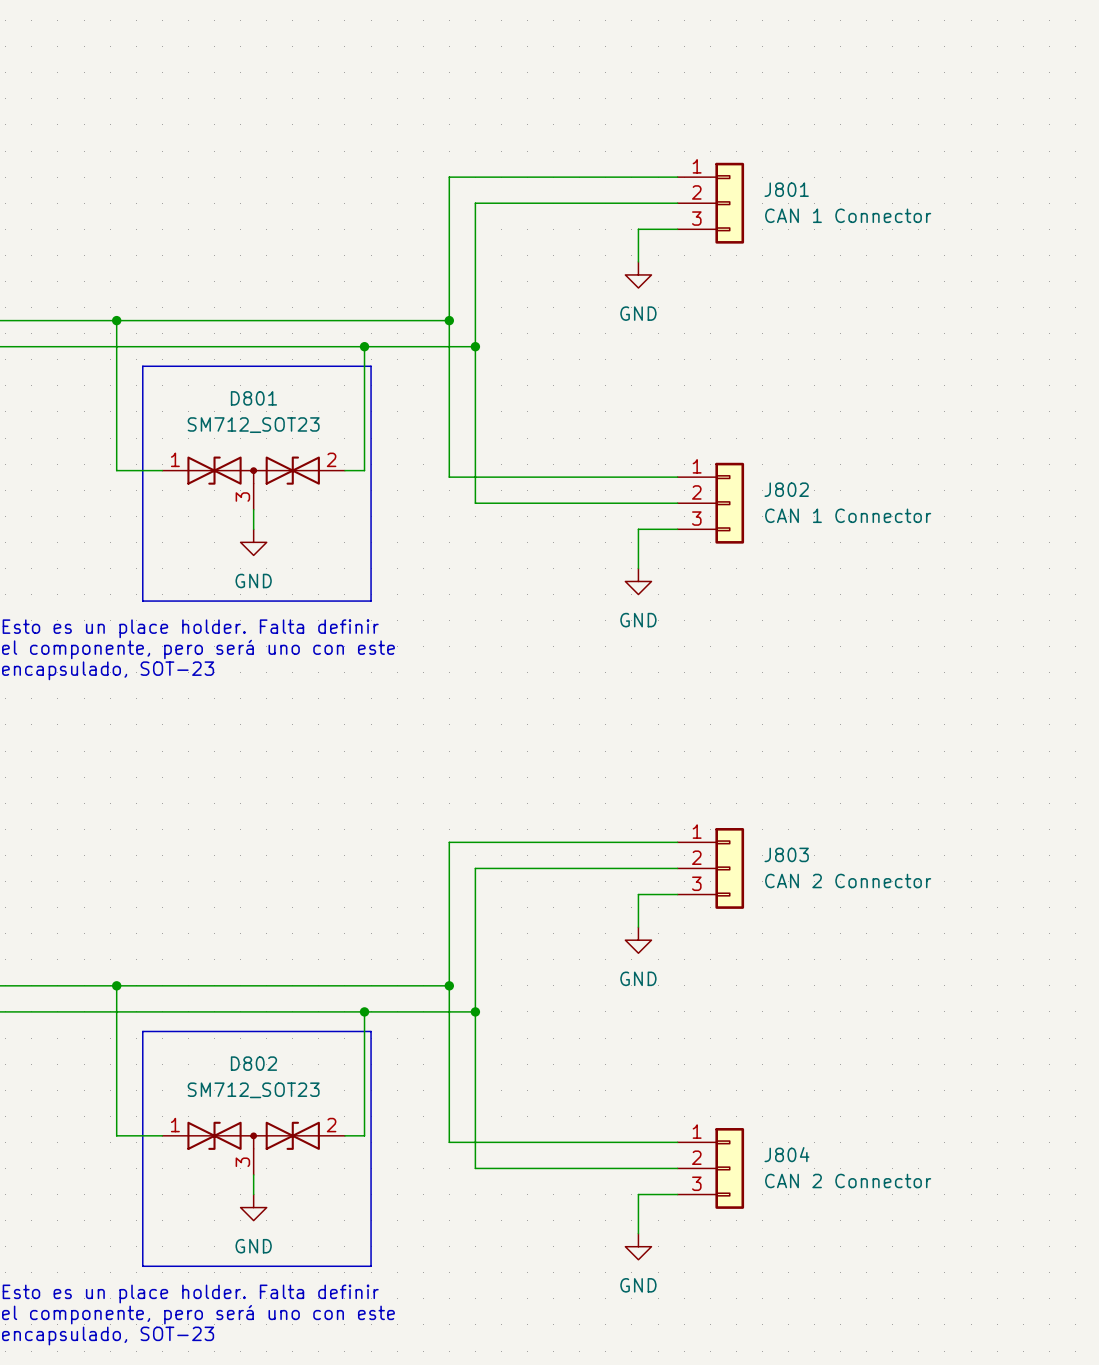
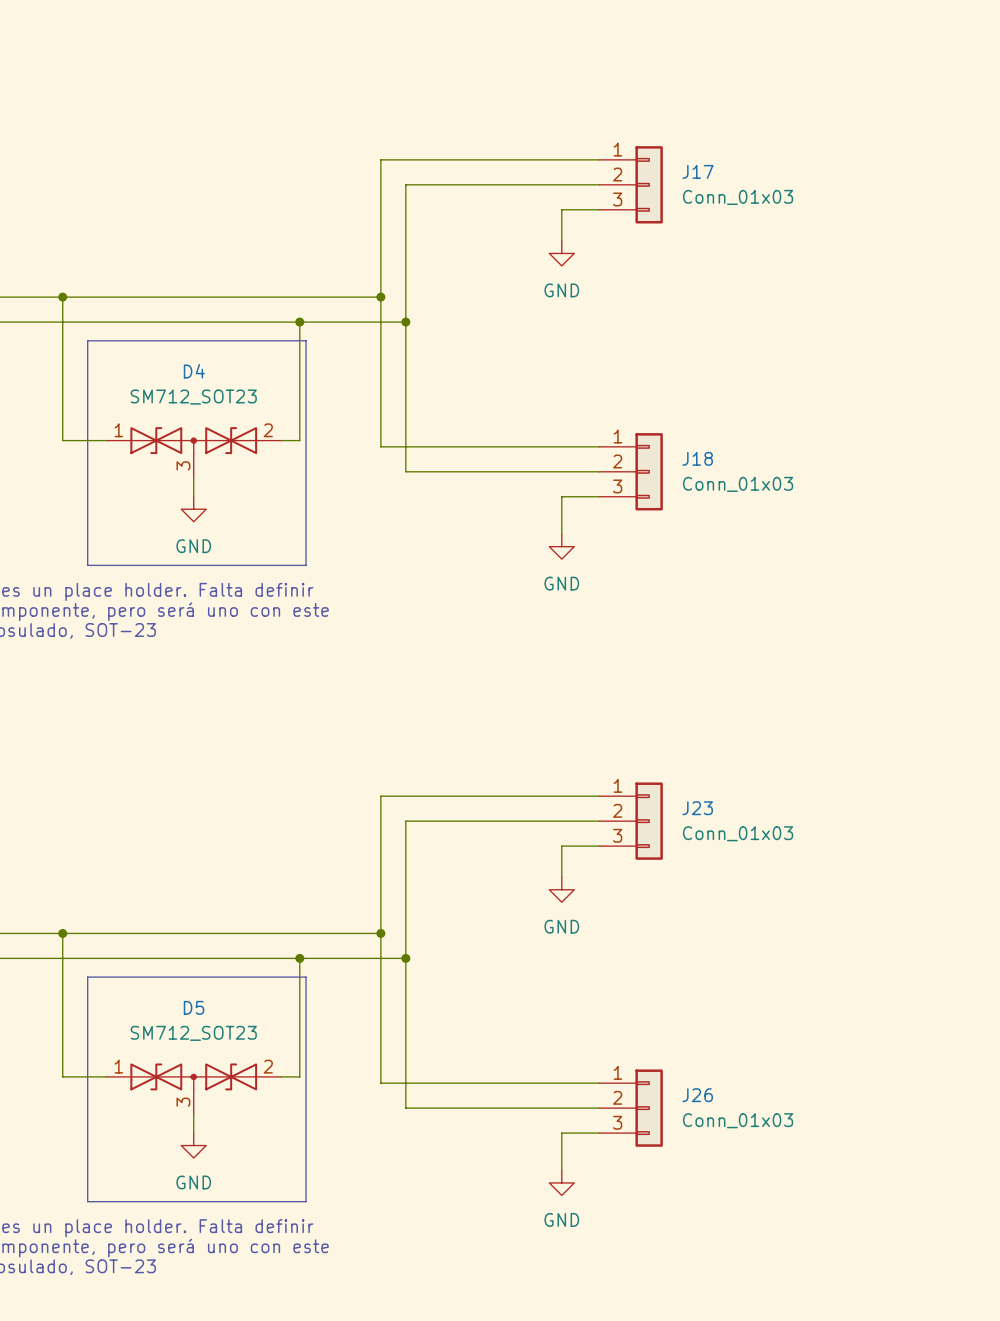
J801 name: J801 (786, 189) -> J17 (697, 171)
J801 value: CAN 1 Connector (848, 215) -> Conn_01x03 (738, 197)
D801 name: D801 (253, 398) -> D4 (194, 371)
J802 name: J802 (786, 489) -> J18 (697, 458)
J802 value: CAN 1 Connector (848, 515) -> Conn_01x03 (738, 484)
J803 name: J803 (786, 854) -> J23 (697, 808)
J803 value: CAN 2 Connector (848, 880) -> Conn_01x03 (738, 833)
D802 name: D802 (253, 1063) -> D5 (194, 1007)
J804 name: J804 (786, 1154) -> J26 (697, 1095)
J804 value: CAN 2 Connector (848, 1181) -> Conn_01x03 (738, 1120)

